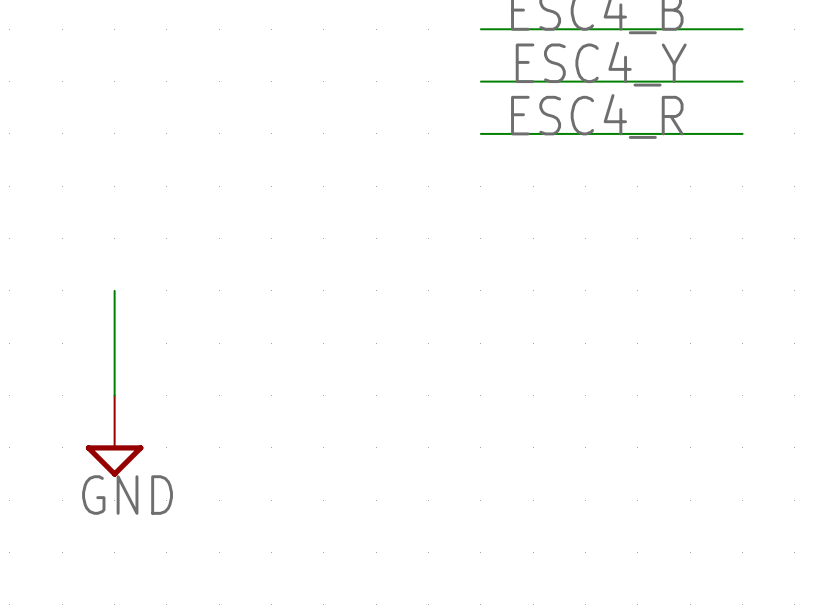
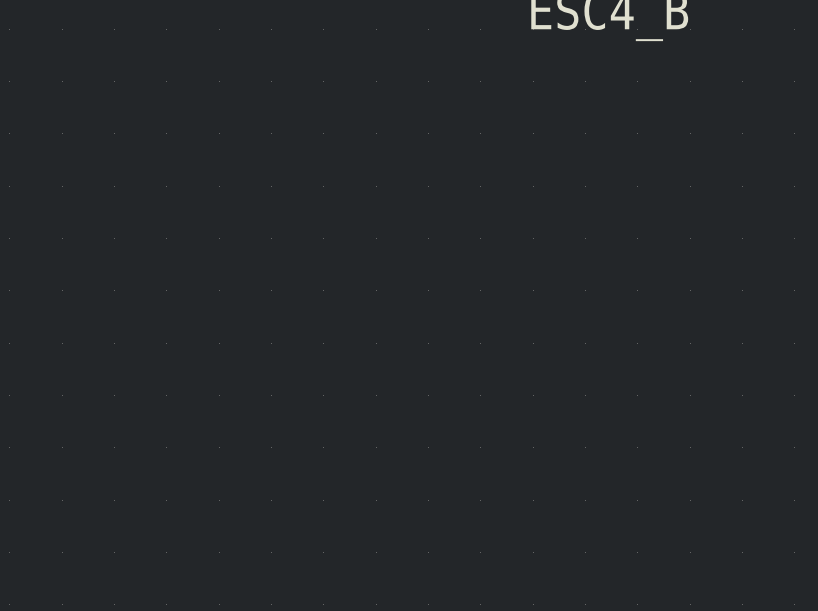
wire: (480, 29) (742, 29) -> none
label: ESC4_Y (601, 64) -> none
wire: (480, 81) (742, 81) -> none
label: ESC4_R (597, 116) -> none
wire: (480, 133) (742, 133) -> none
wire: (114, 290) (114, 395) -> none
power symbol: GND (114, 436) -> none

